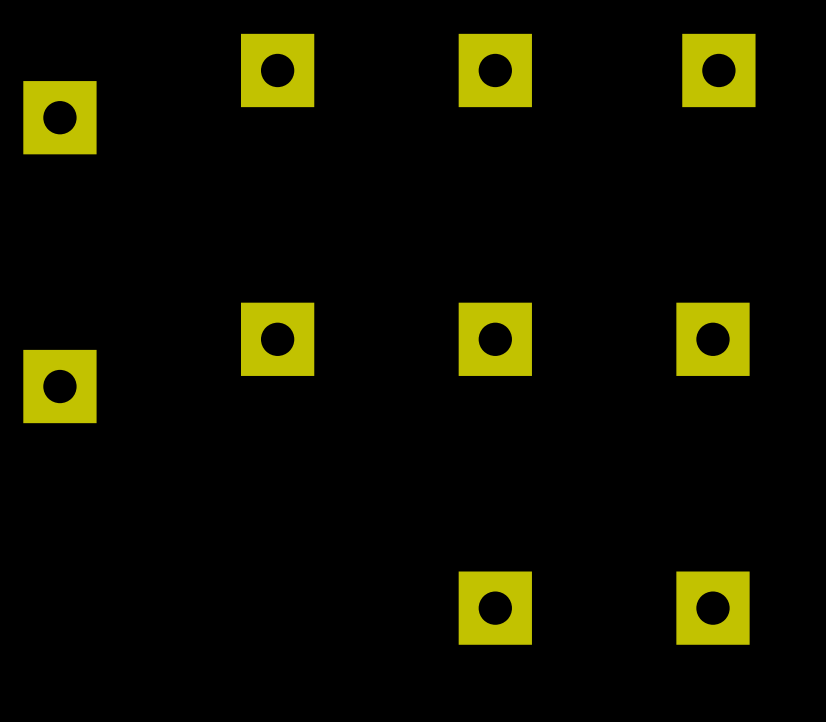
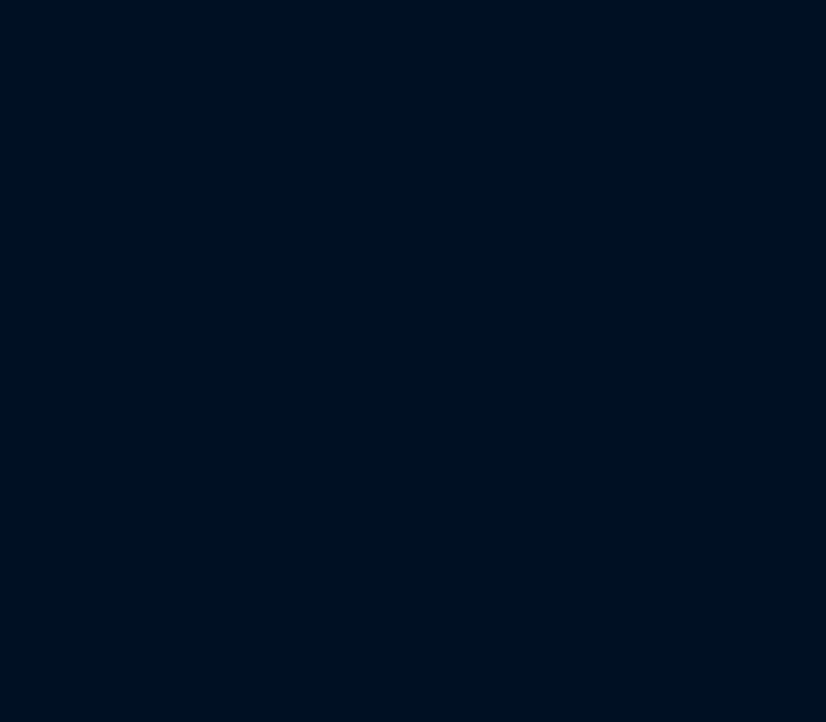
part: (277, 70) -> none
part: (495, 70) -> none
part: (718, 70) -> none
part: (59, 117) -> none
part: (277, 339) -> none
part: (495, 339) -> none
part: (712, 339) -> none
part: (59, 386) -> none
part: (495, 608) -> none
part: (712, 608) -> none

